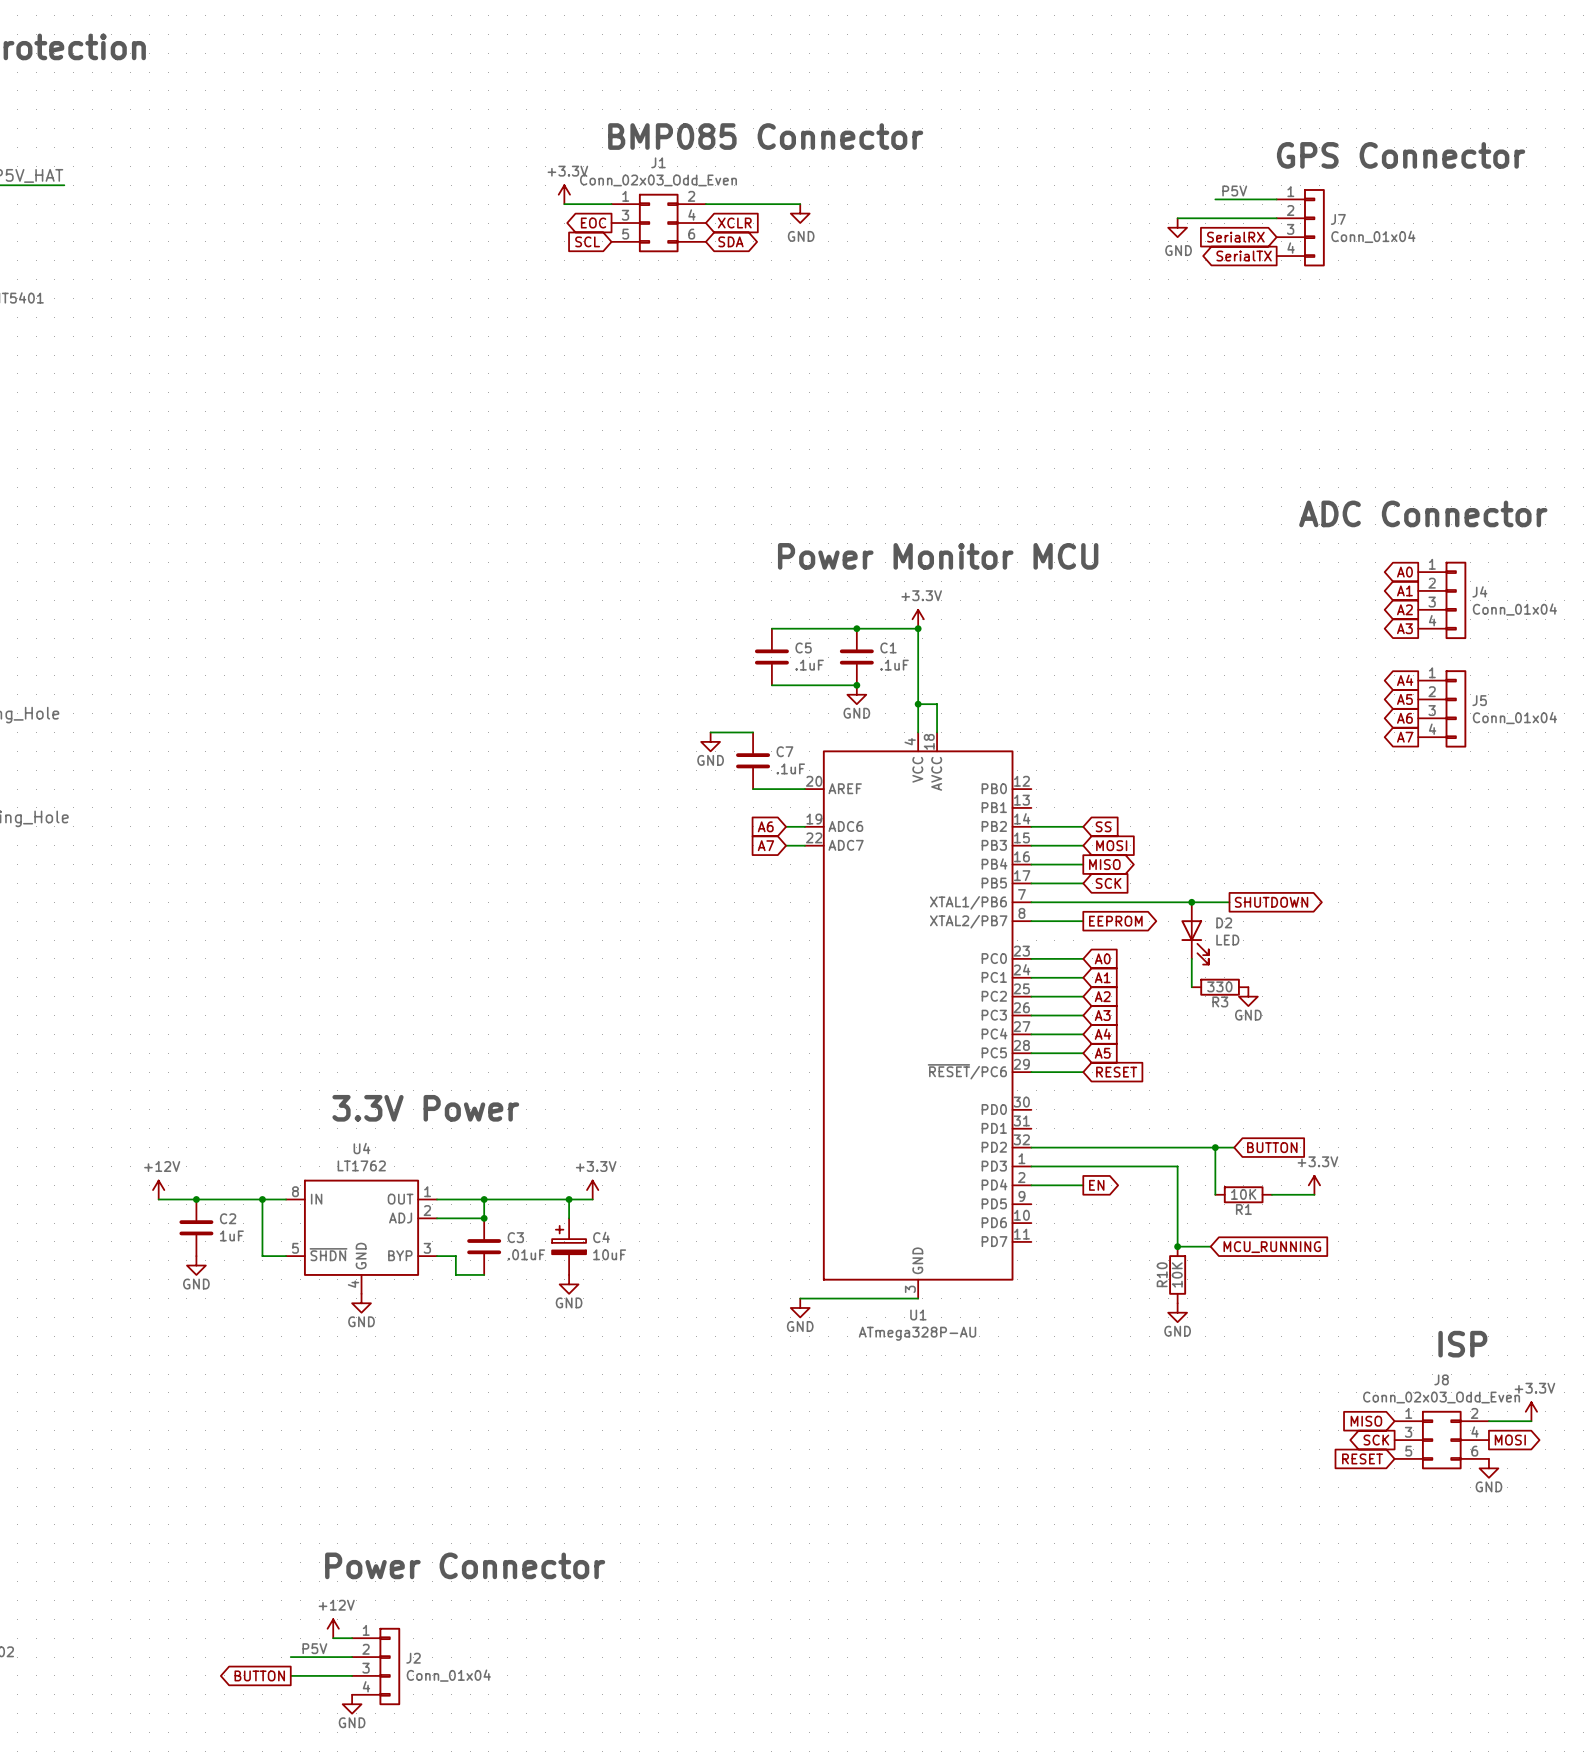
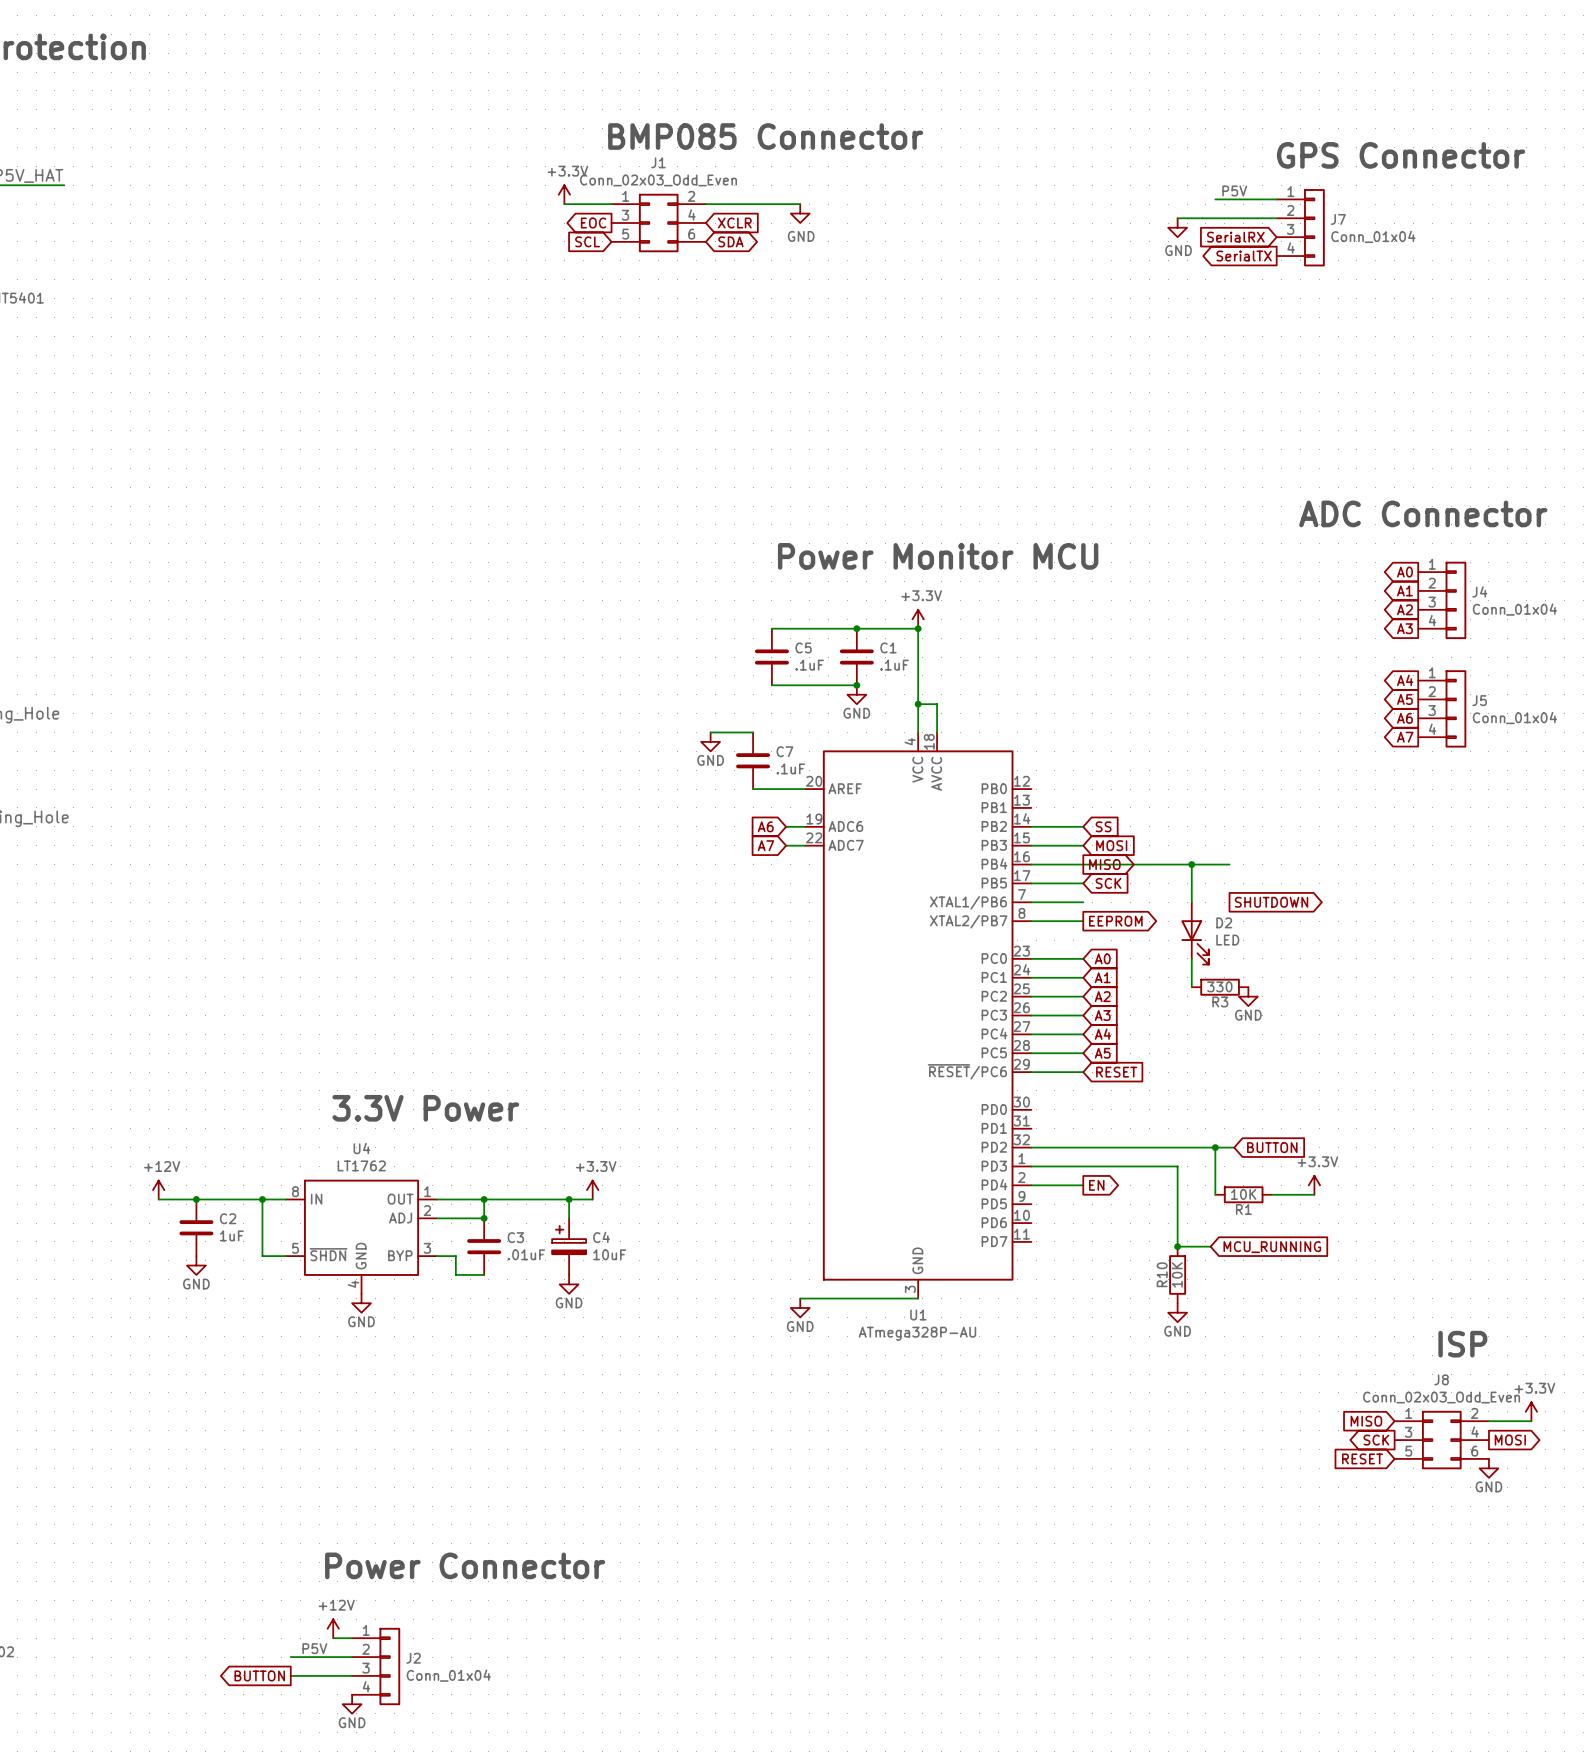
wire: none -> (1191, 864) (1191, 902)
wire: (1083, 902) (1229, 902) -> (1083, 864) (1229, 864)
junction position: (1191, 902) -> (1191, 864)

